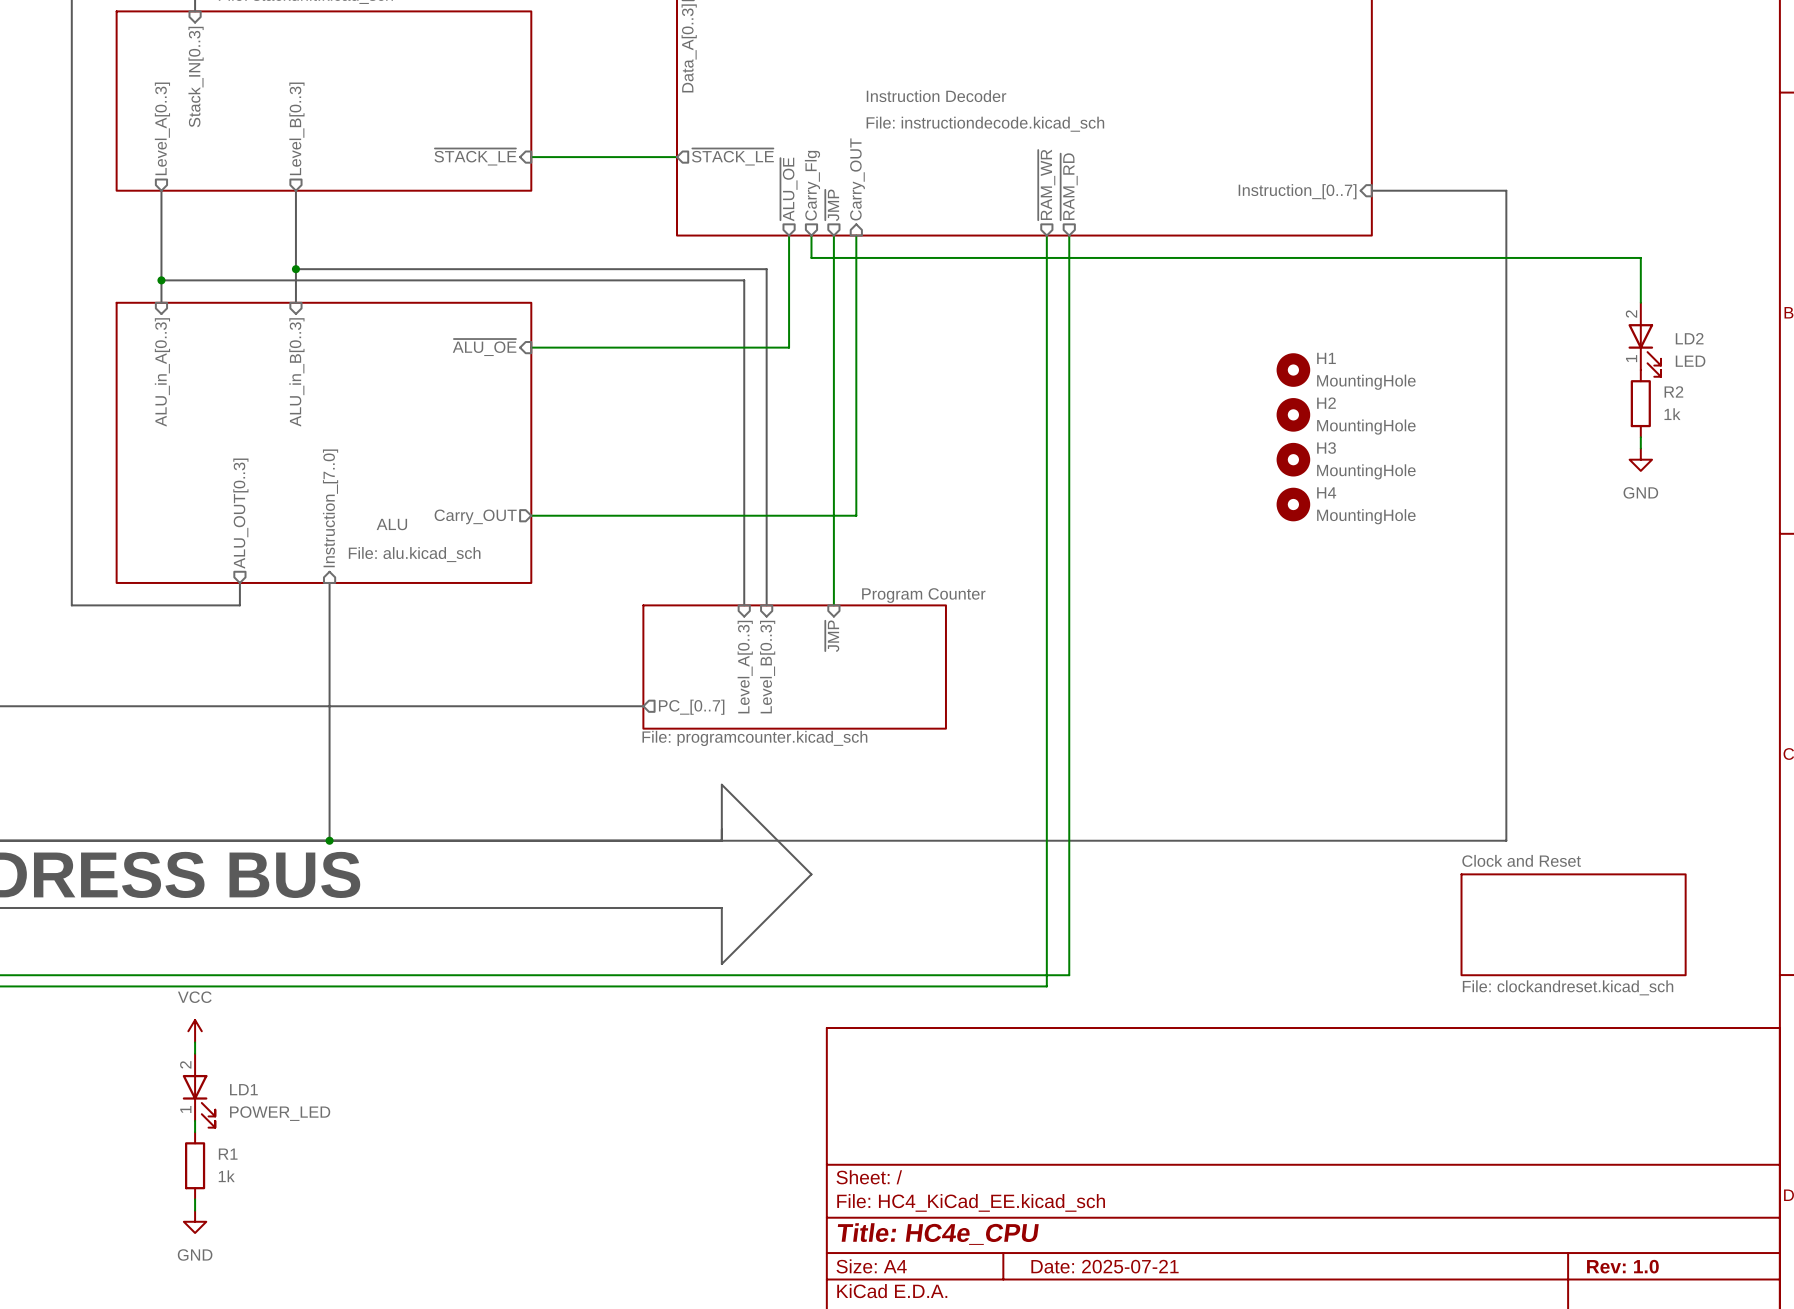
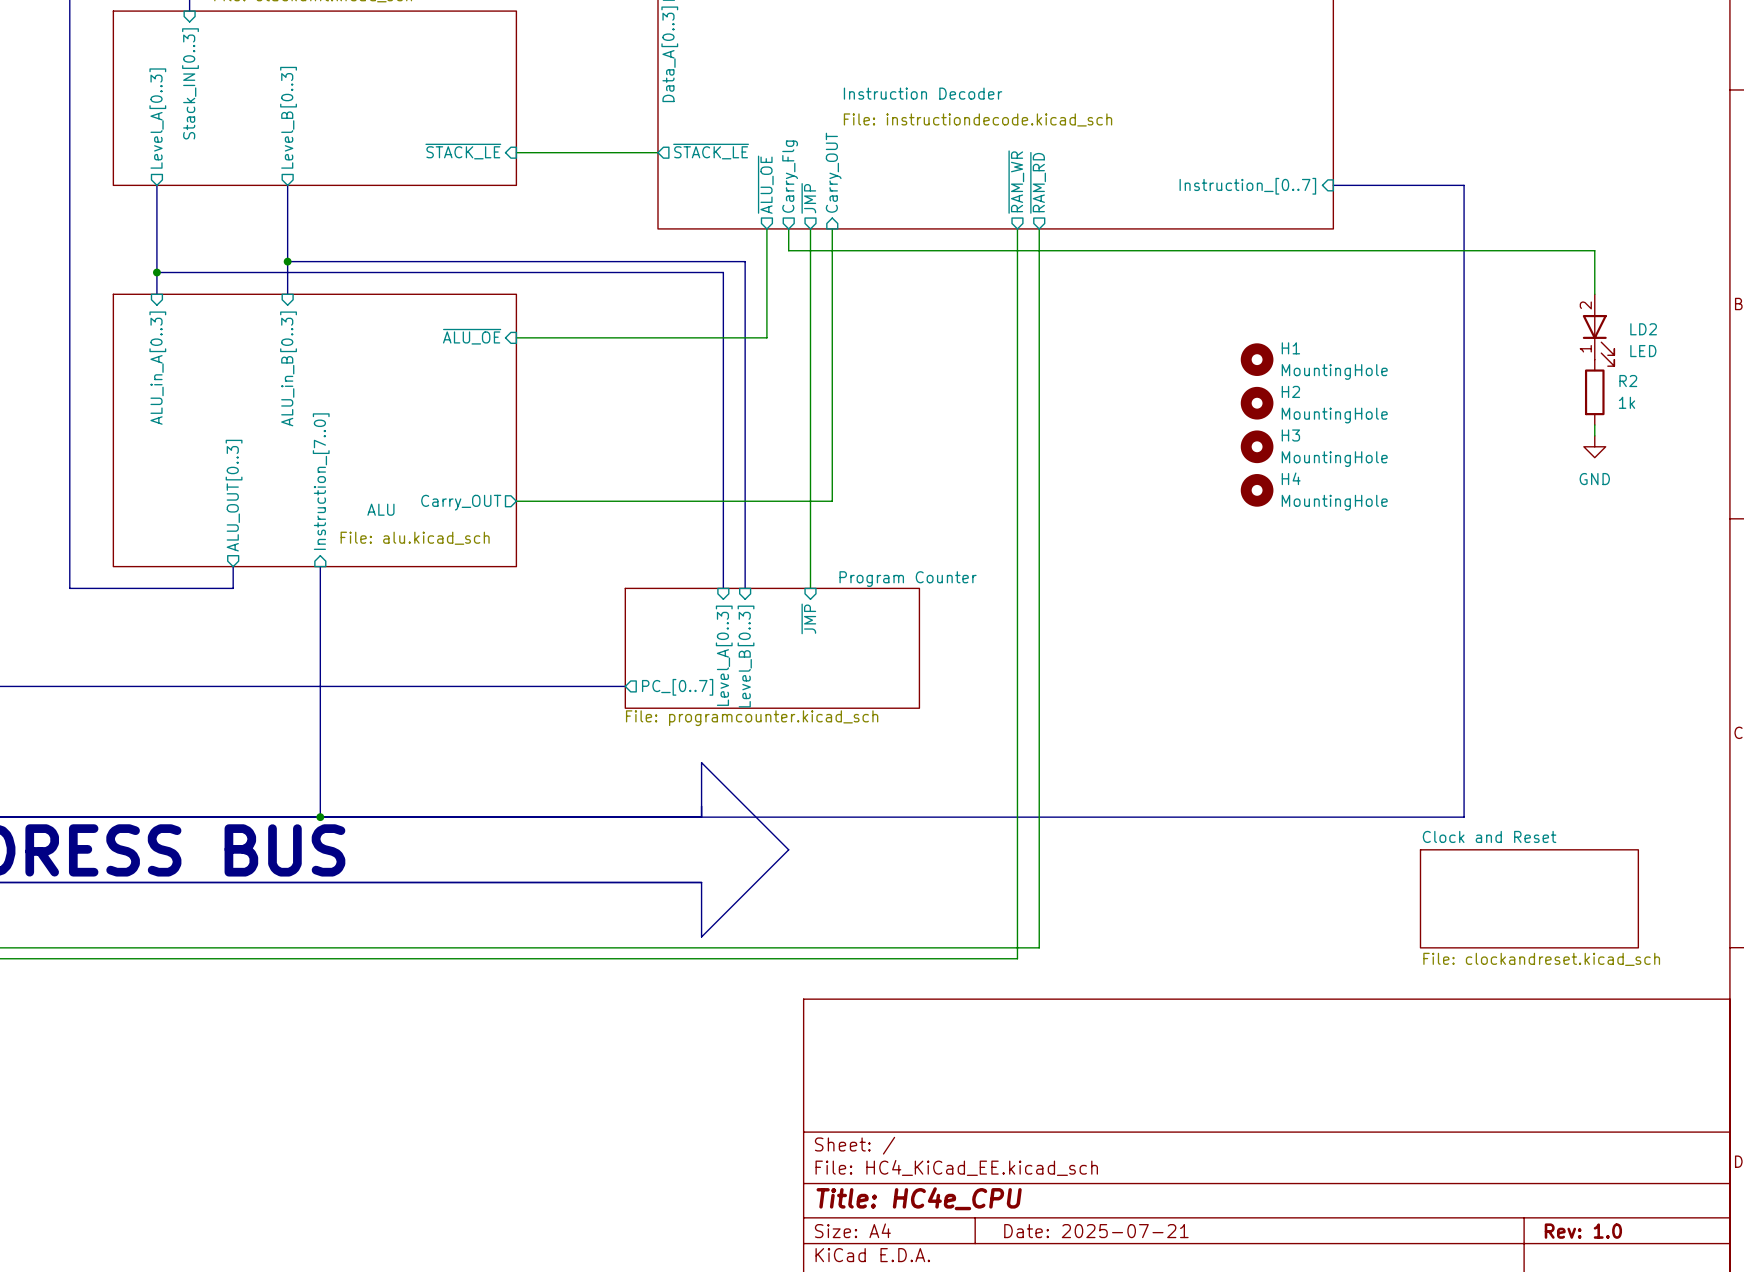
power symbol: VCC (195, 1031) -> none
wire: (195, 1042) (195, 1053) -> none
LD1: POWER_LED (199, 1090) -> none
wire: (195, 1120) (195, 1132) -> none
R1: 1k (195, 1165) -> none
wire: (195, 1199) (195, 1210) -> none
power symbol: GND (195, 1221) -> none

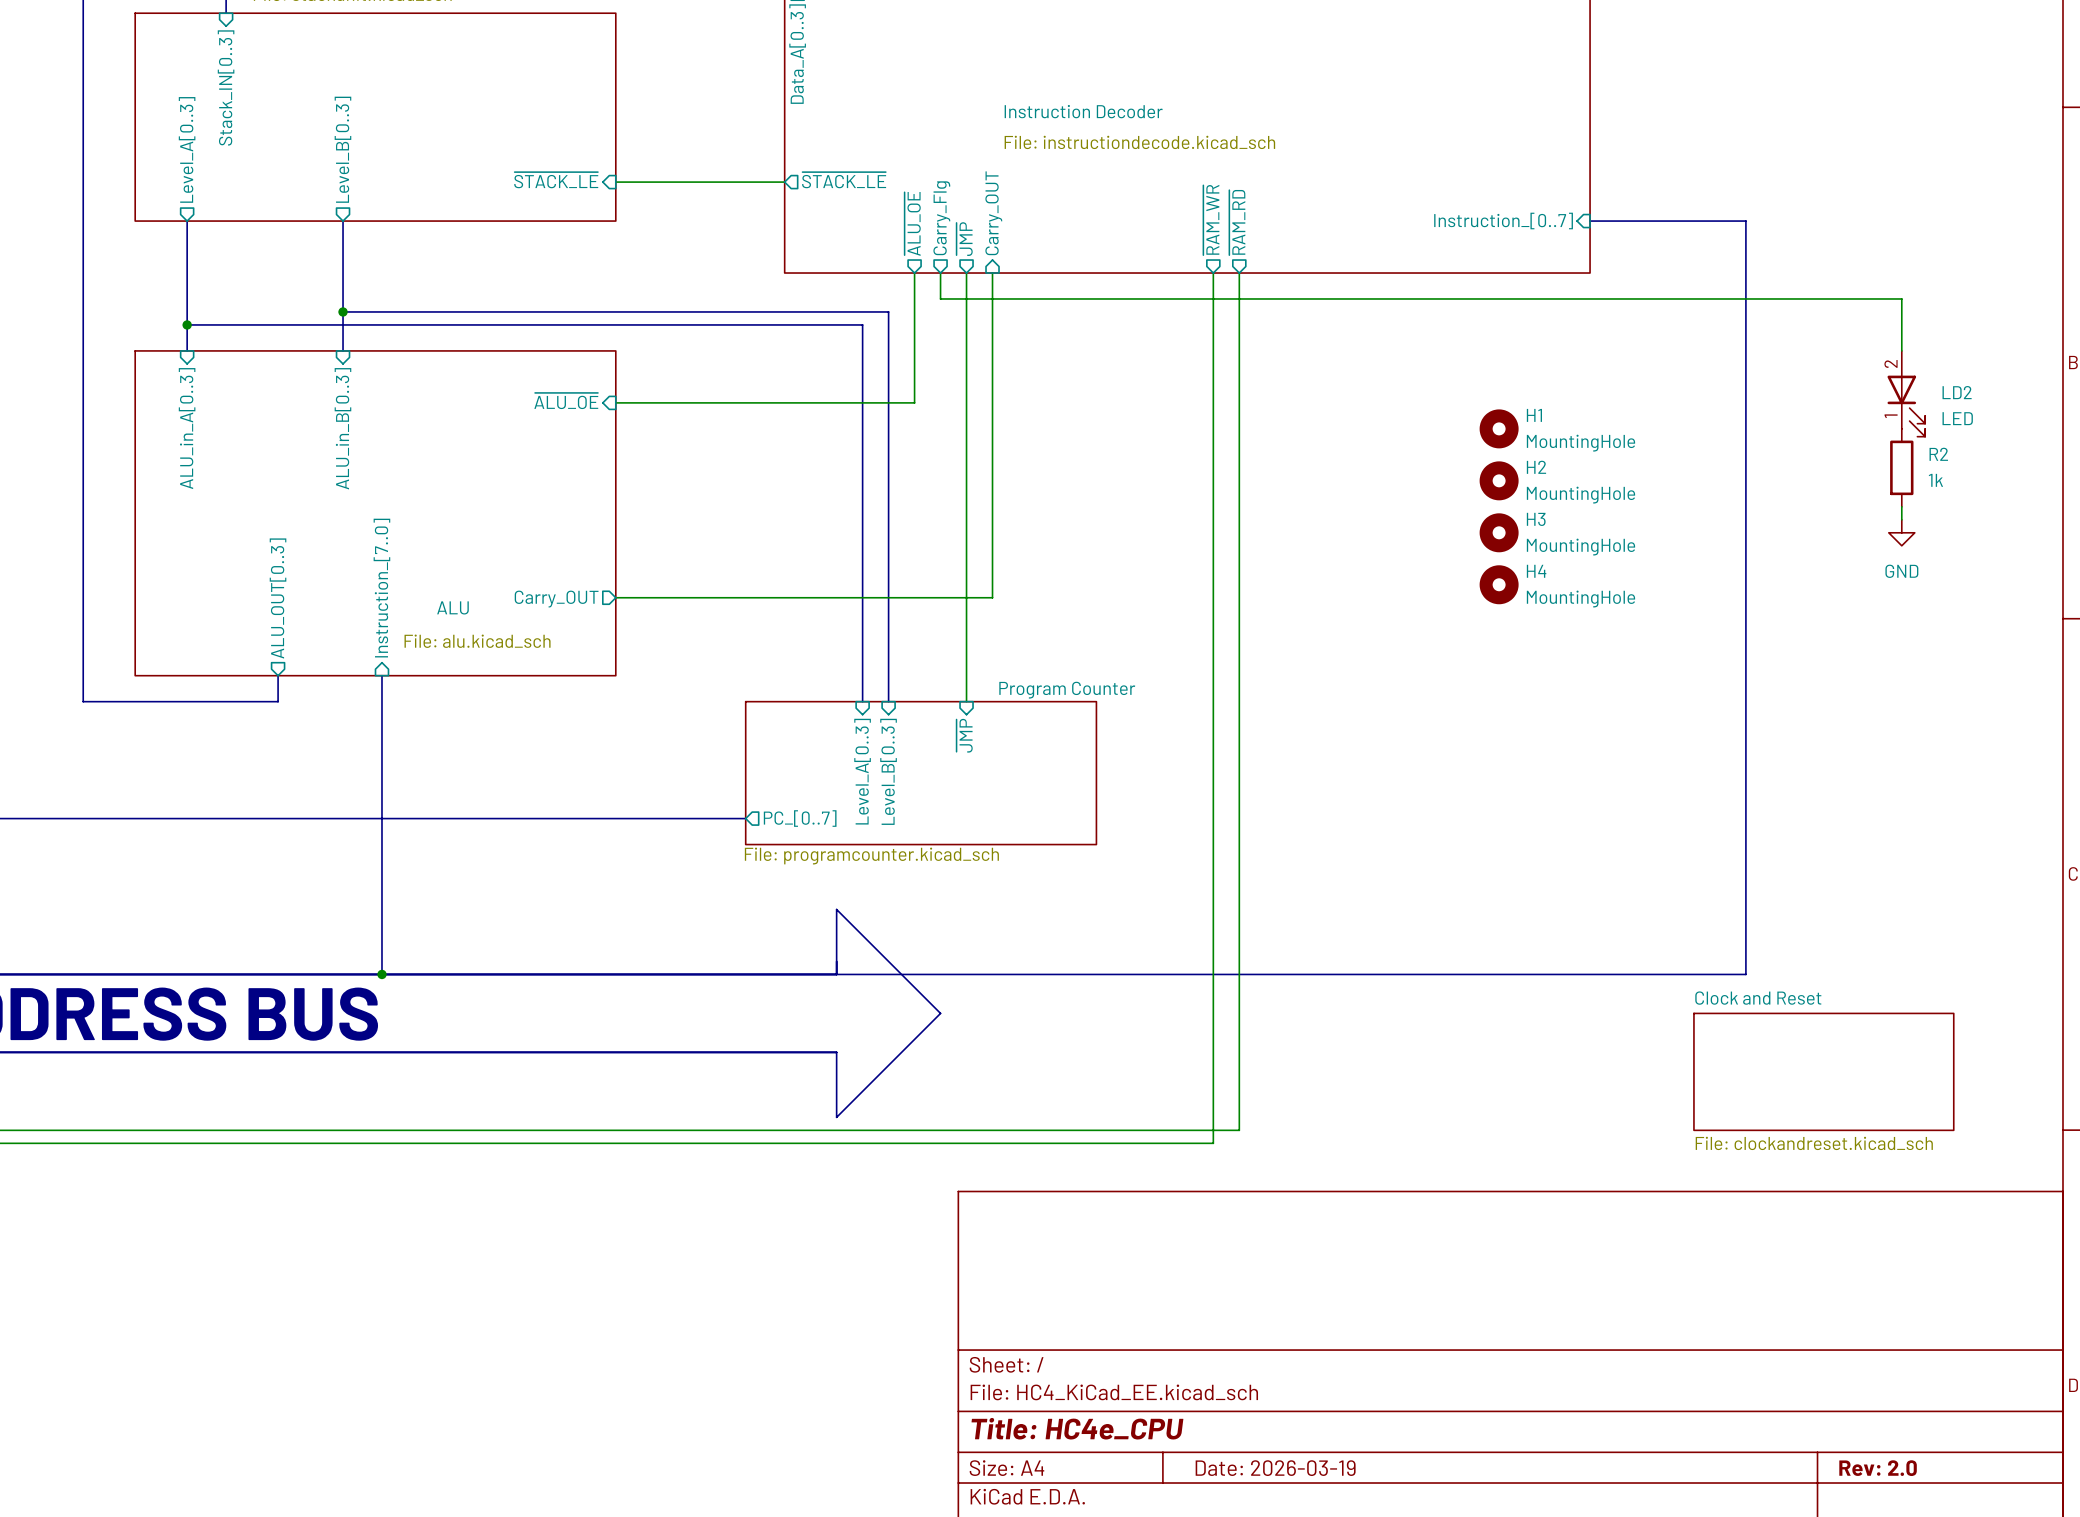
title block: Date: 2025-07-21 (1096, 1231) -> Date: 2026-03-19 (1275, 1468)
title block: Rev: 1.0 (1583, 1231) -> Rev: 2.0 (1878, 1468)

